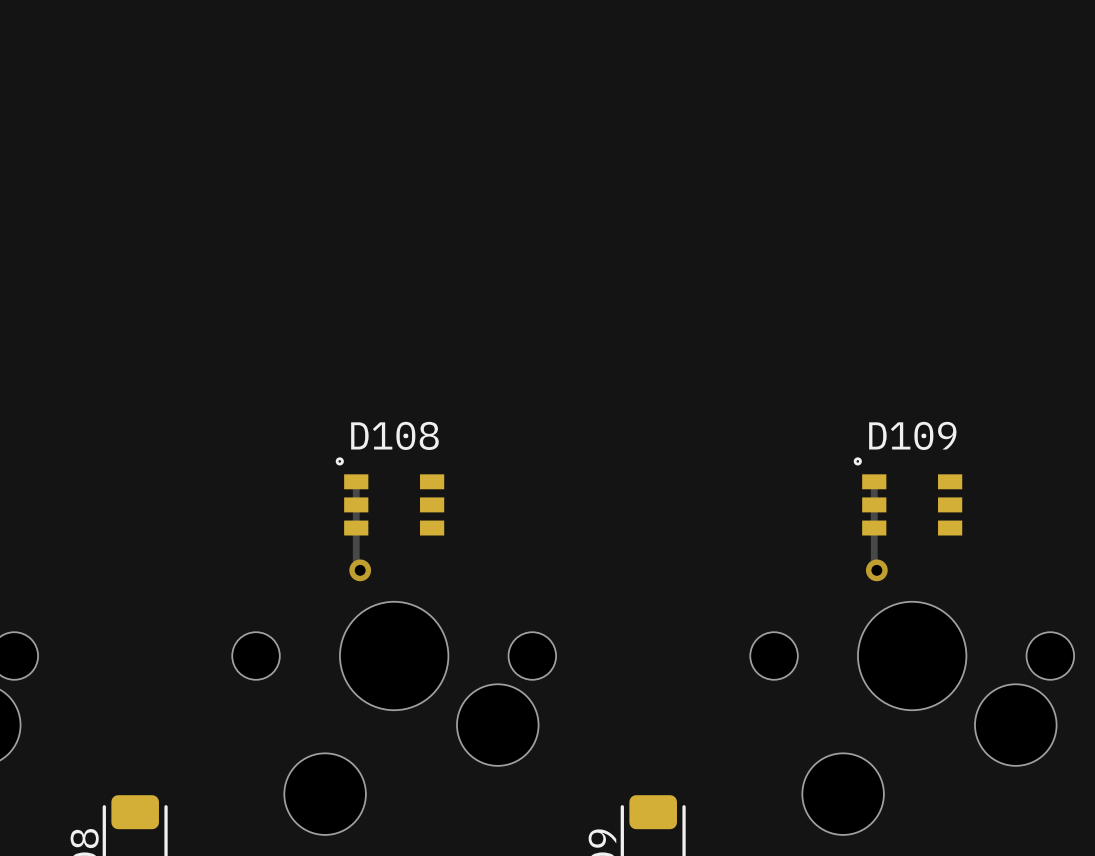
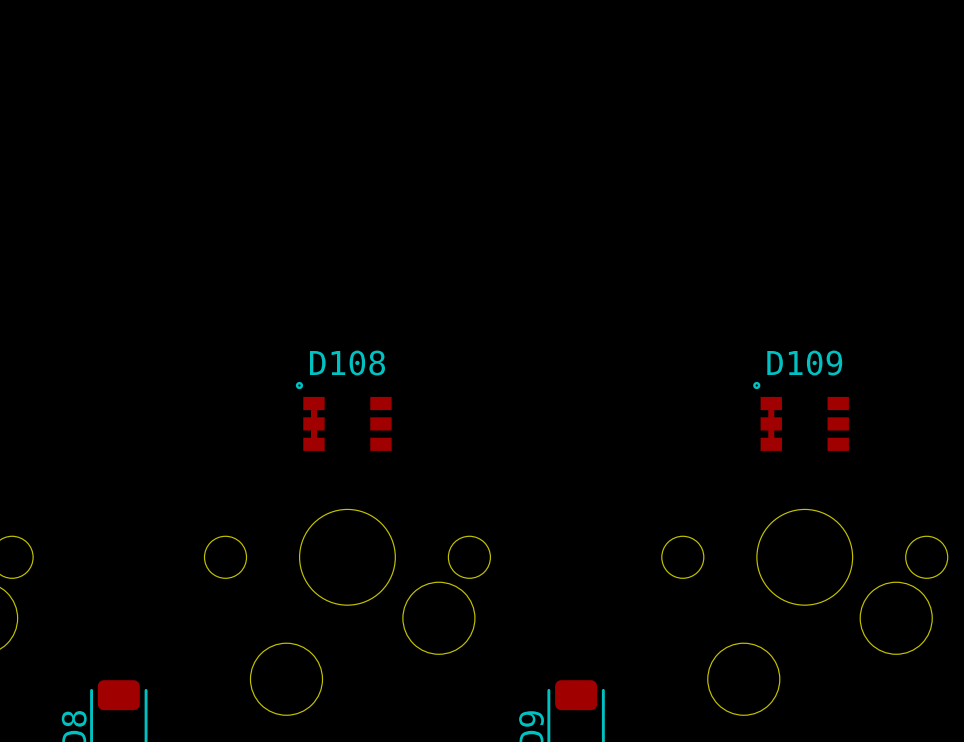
track: (356, 528) (356, 566) (360, 570) -> none
track: (874, 528) (874, 567) (876, 570) -> none
via: (360, 570) -> none
via: (876, 570) -> none

